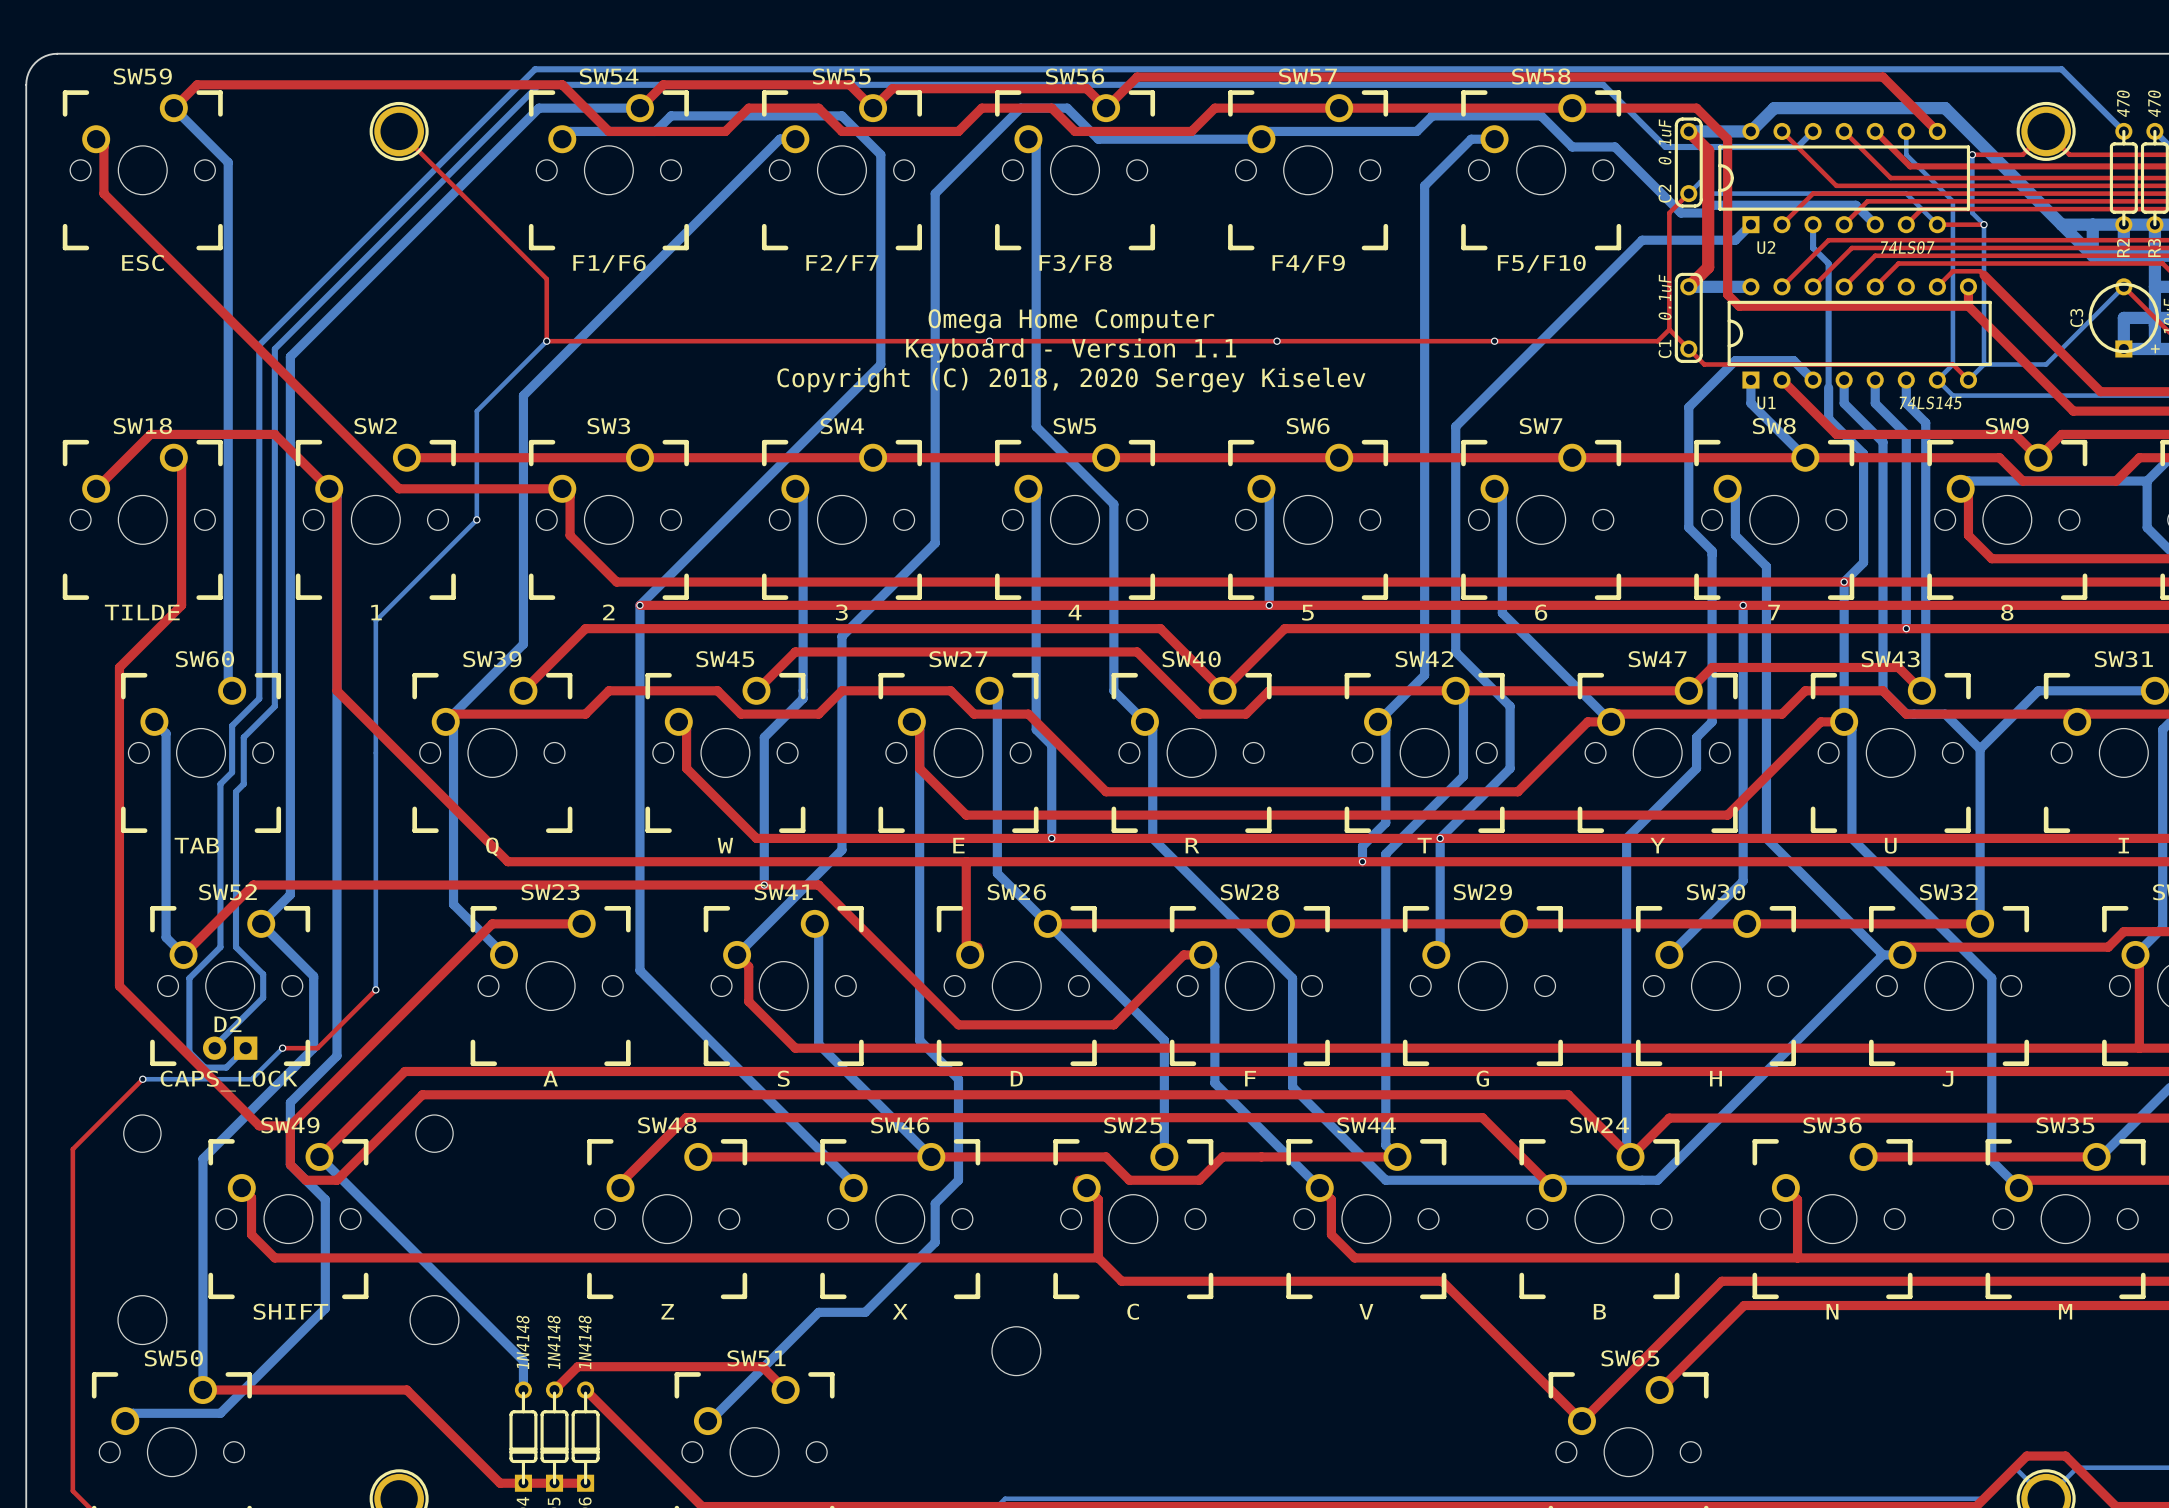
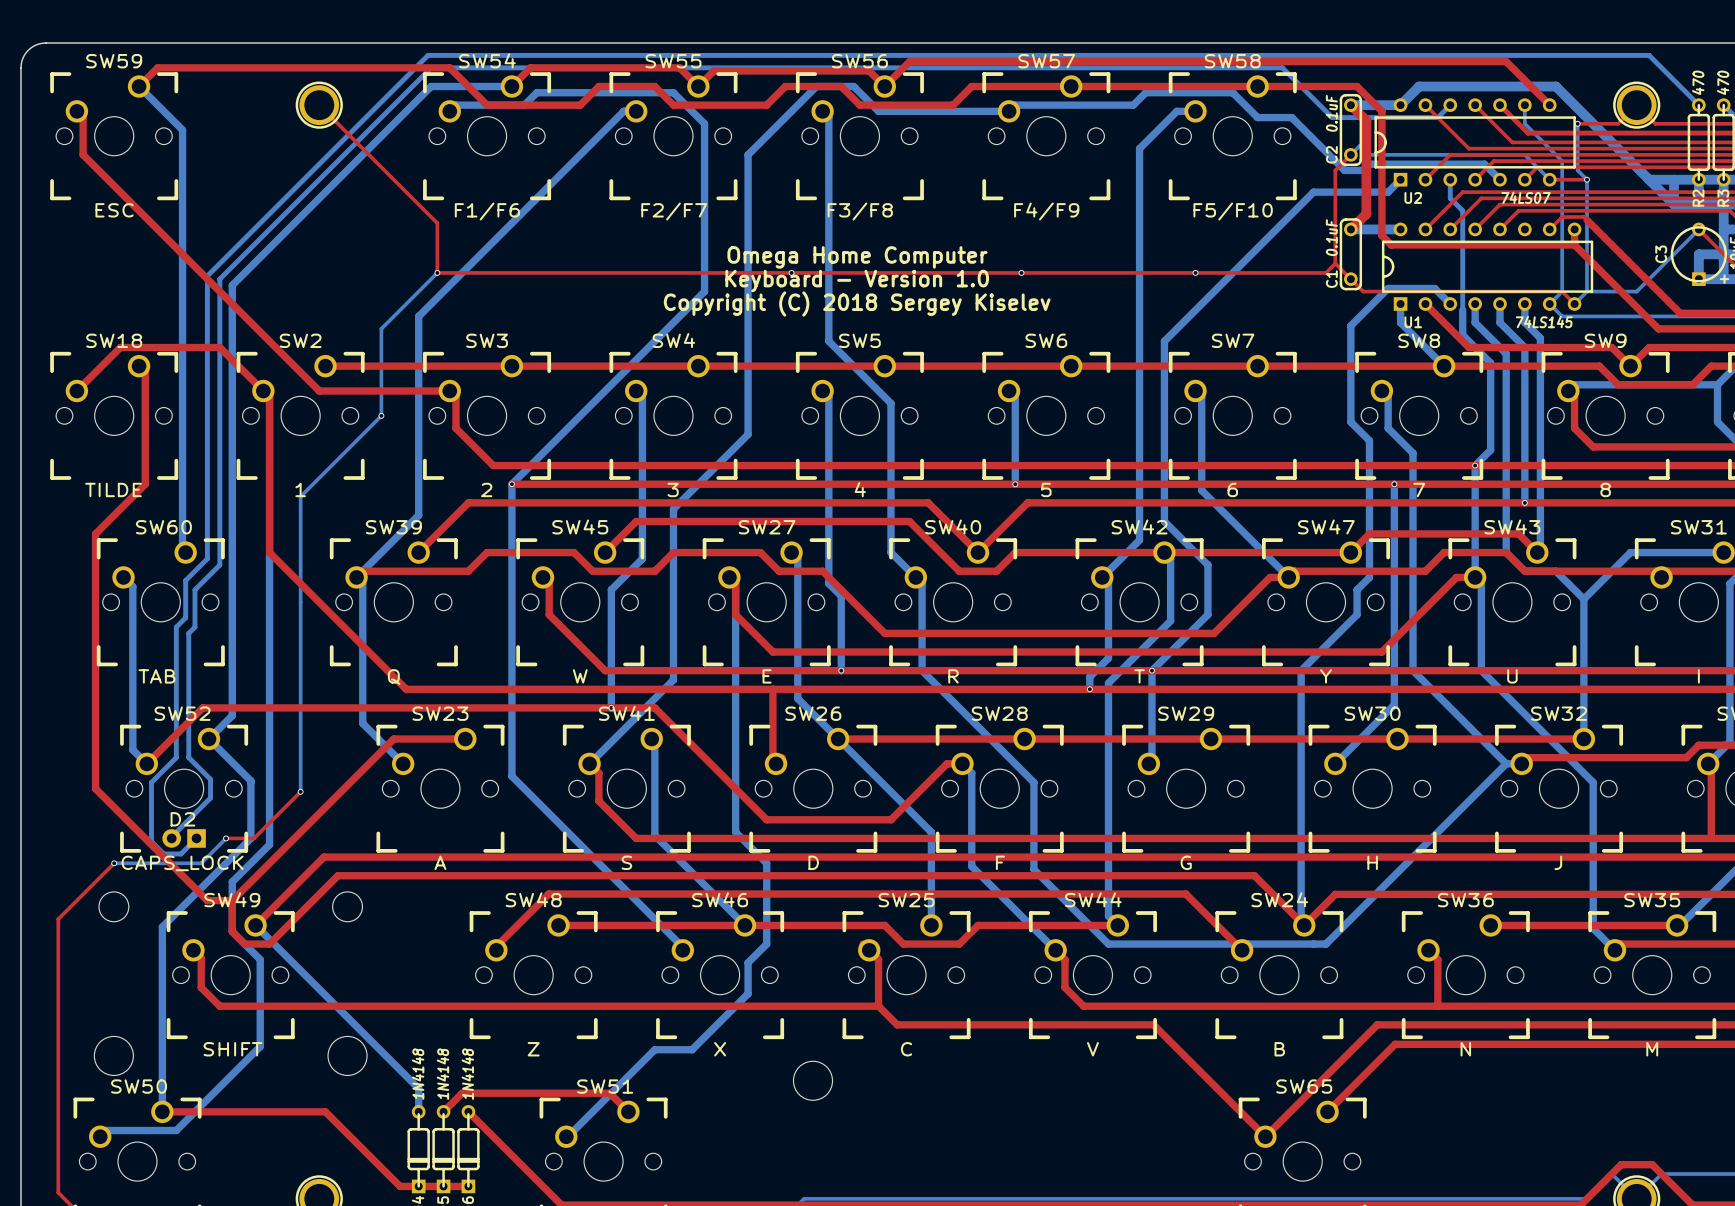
text: Keyboard - Version 1.1 (1071, 350) -> Keyboard - Version 1.0 (857, 281)
text: Copyright (C) 2018, 2020 Sergey Kiselev (1071, 380) -> Copyright (C) 2018 Sergey Kiselev (857, 303)

